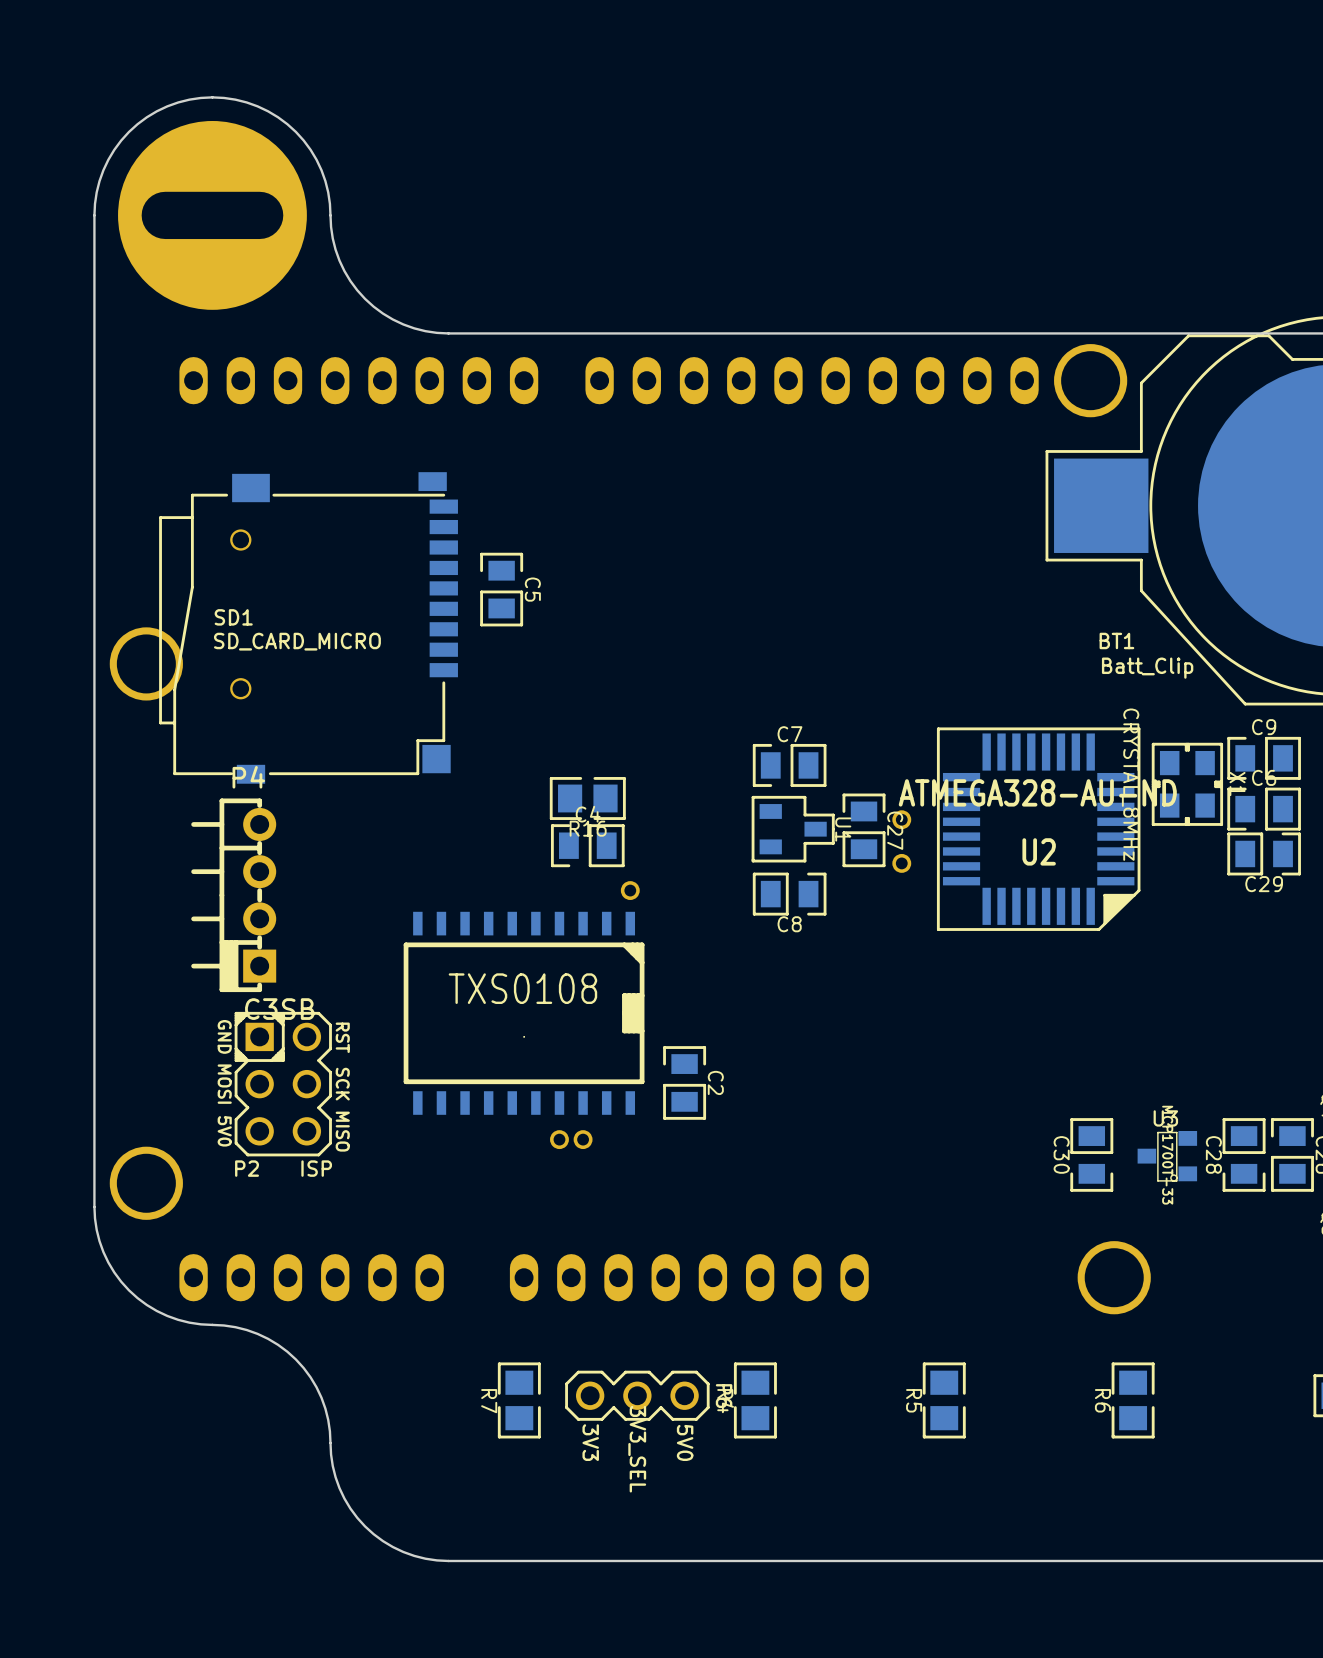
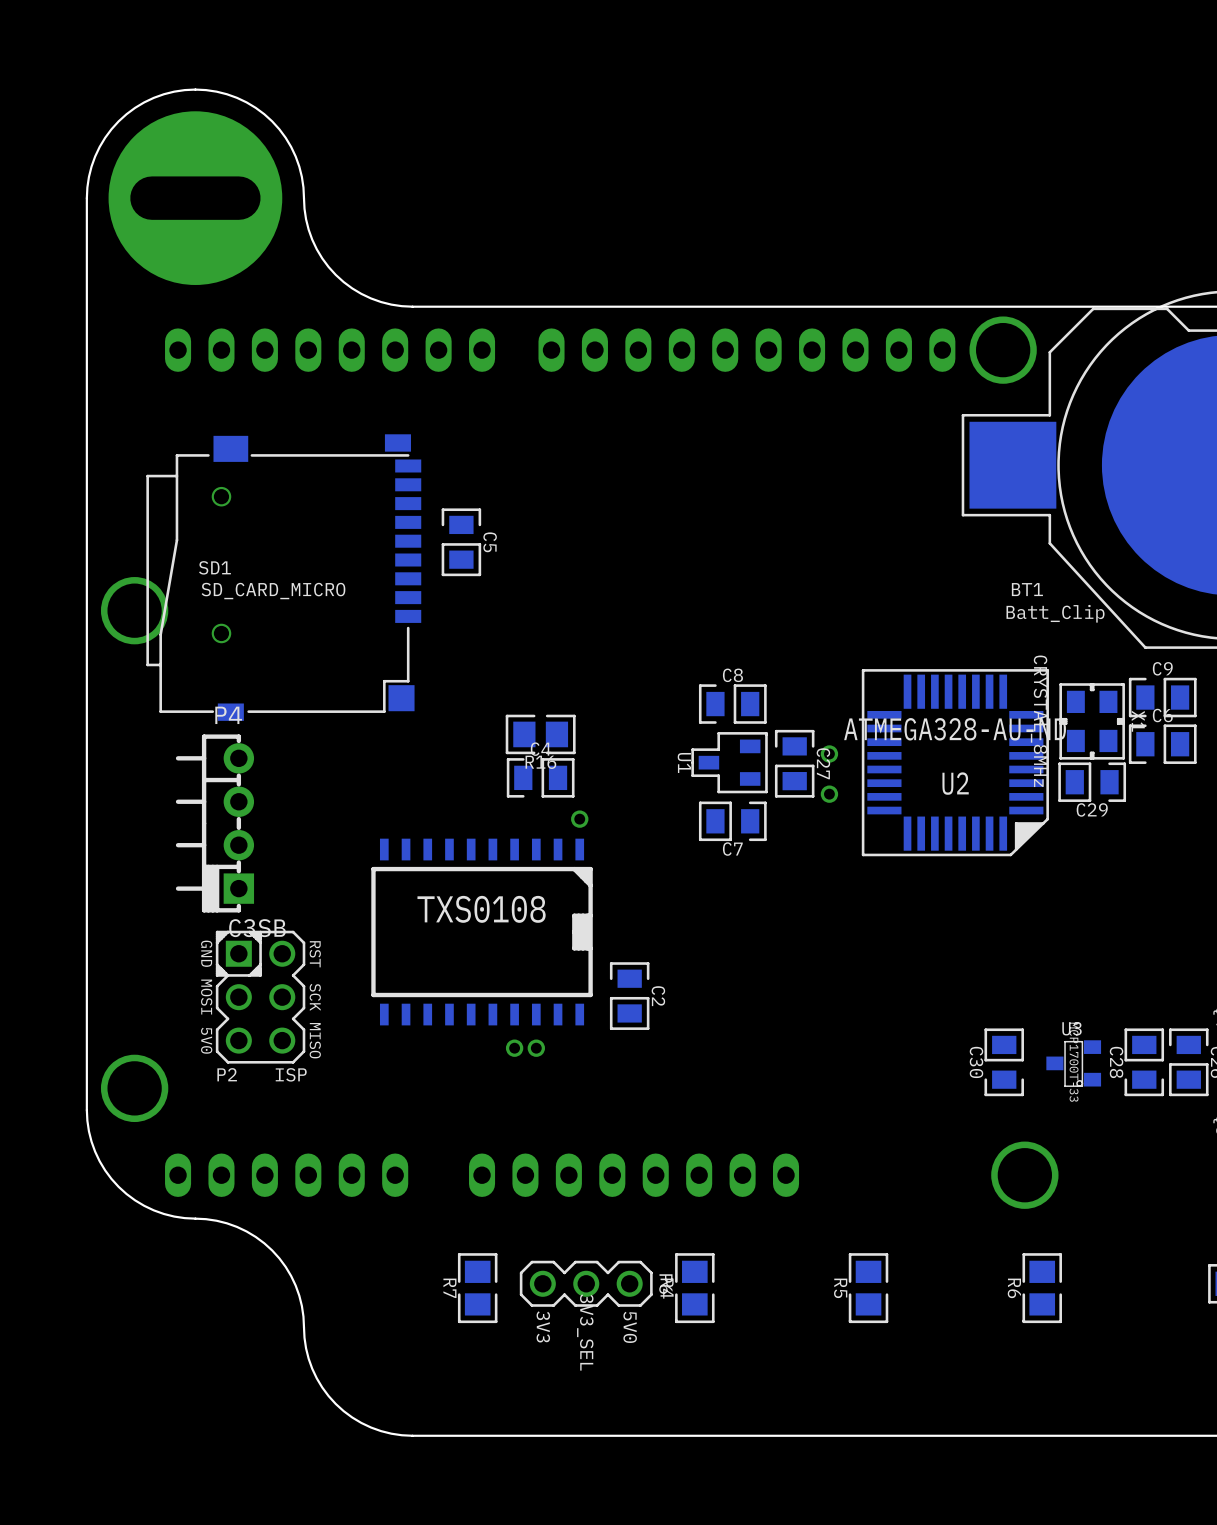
C7 rotation: 0° (789, 765) -> 180° (732, 821)
C7 position: (789, 765) -> (732, 821)
U1 rotation: 0° (793, 829) -> 180° (729, 762)
C29 position: (1264, 853) -> (1092, 782)
C8 rotation: 0° (789, 894) -> 180° (732, 704)
C8 position: (789, 894) -> (732, 704)

